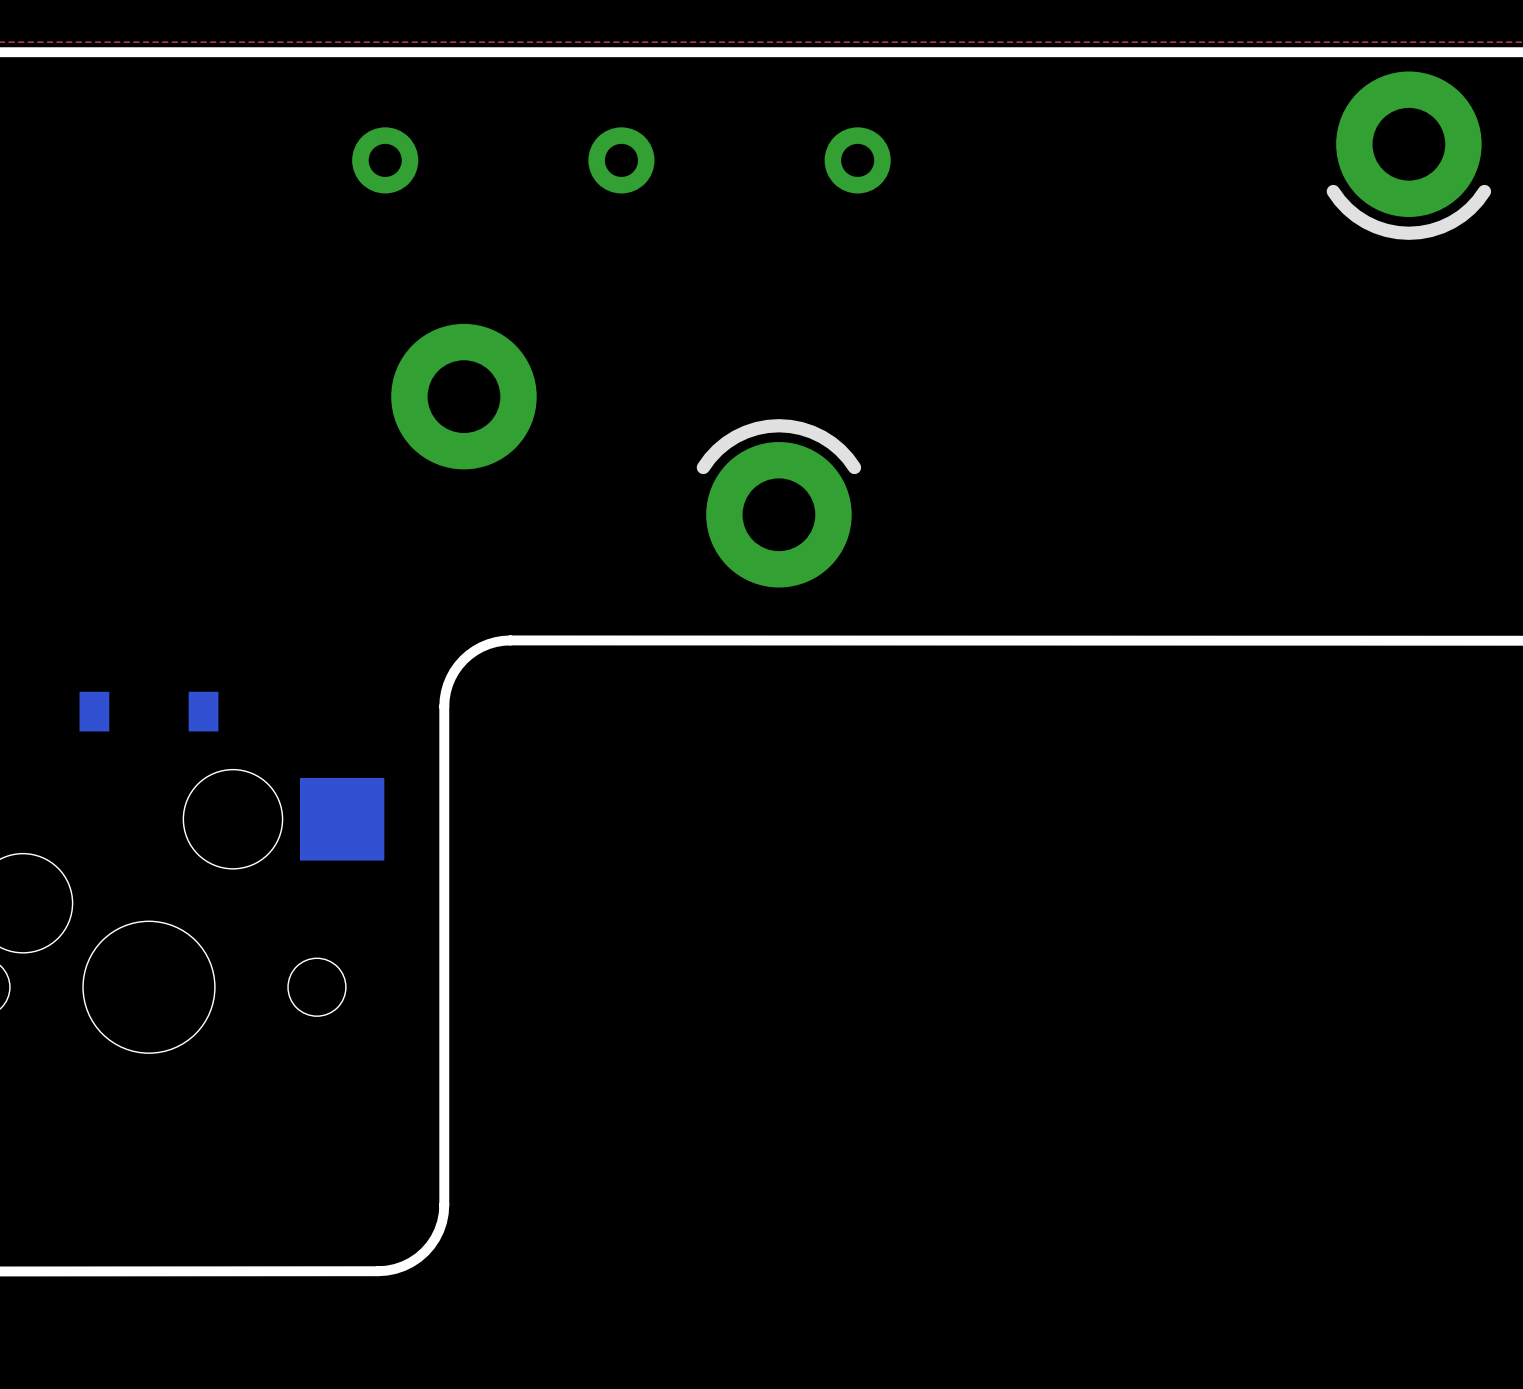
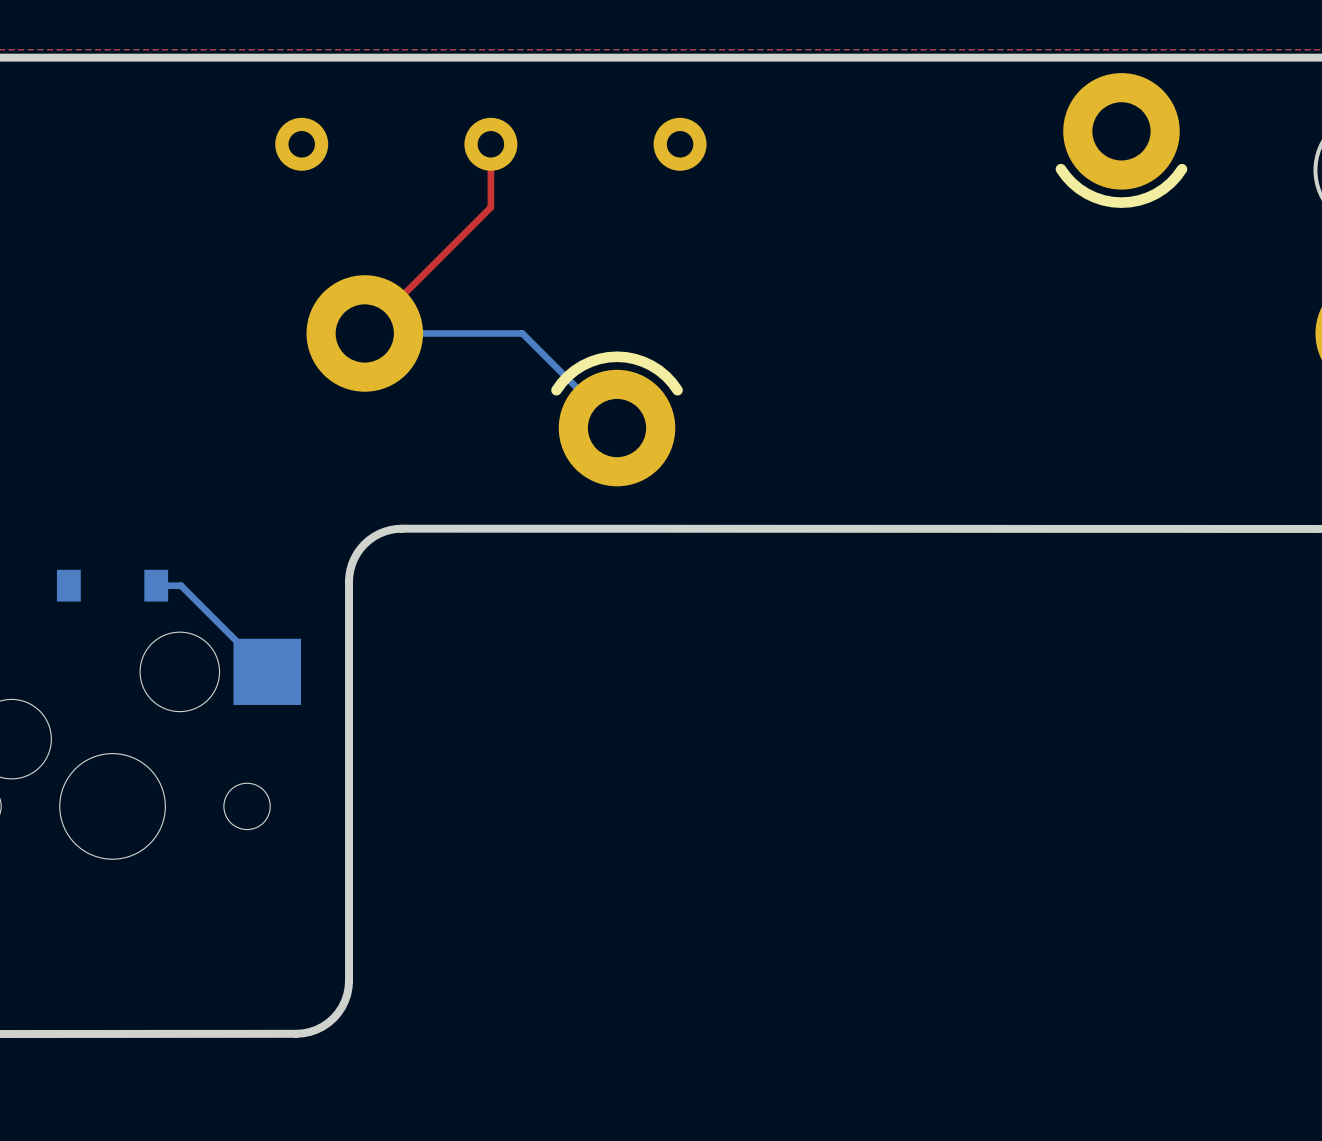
top track: none -> (490, 144) (490, 207) (364, 333)
bottom track: none -> (364, 333) (522, 333) (617, 428)
bottom track: none -> (156, 585) (181, 585) (267, 671)

